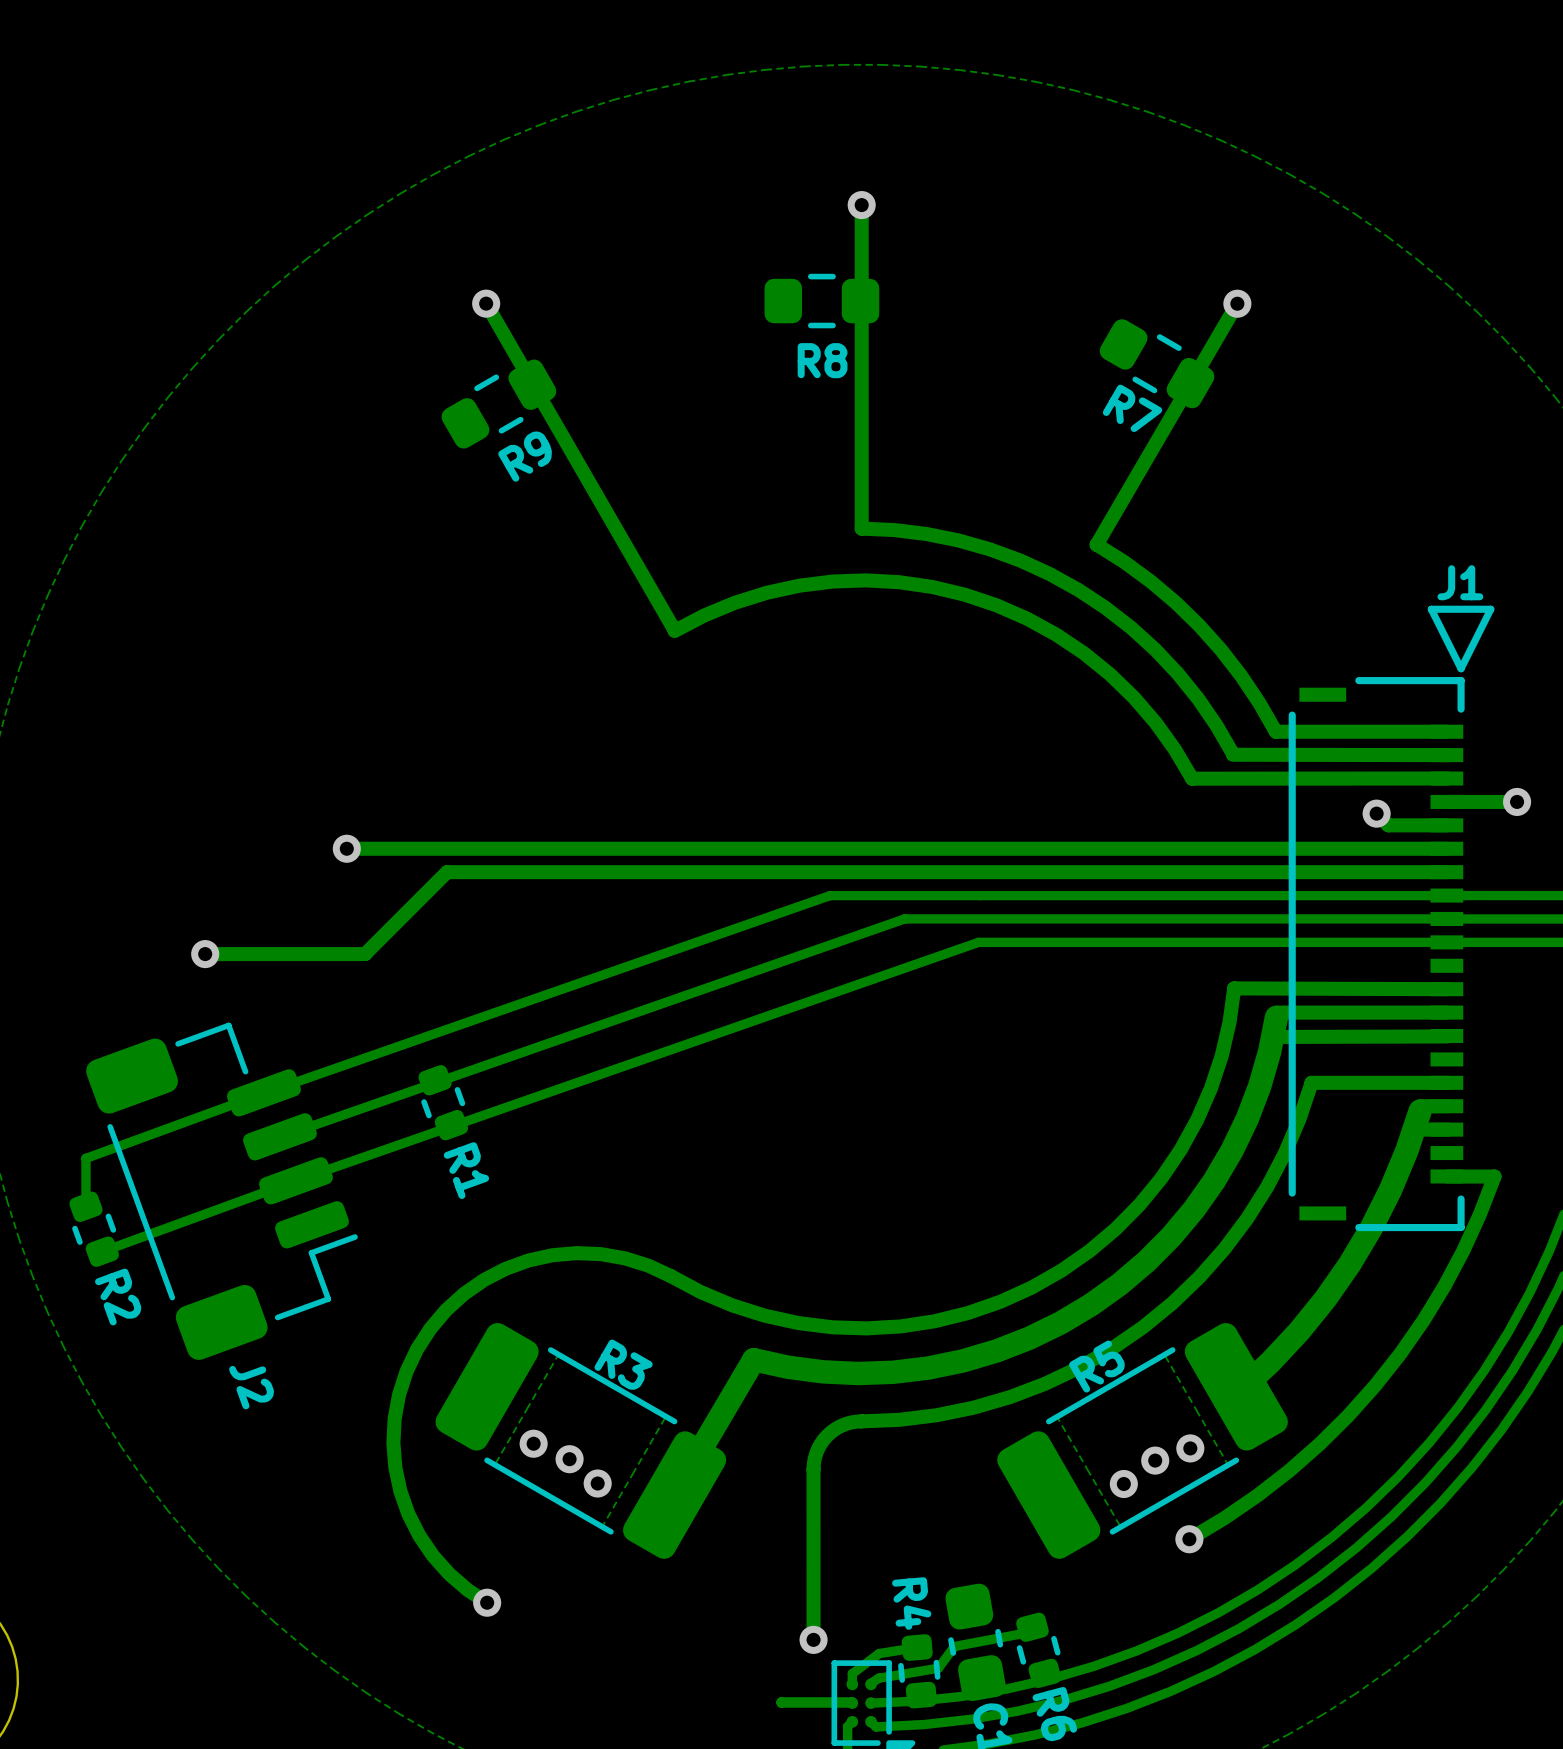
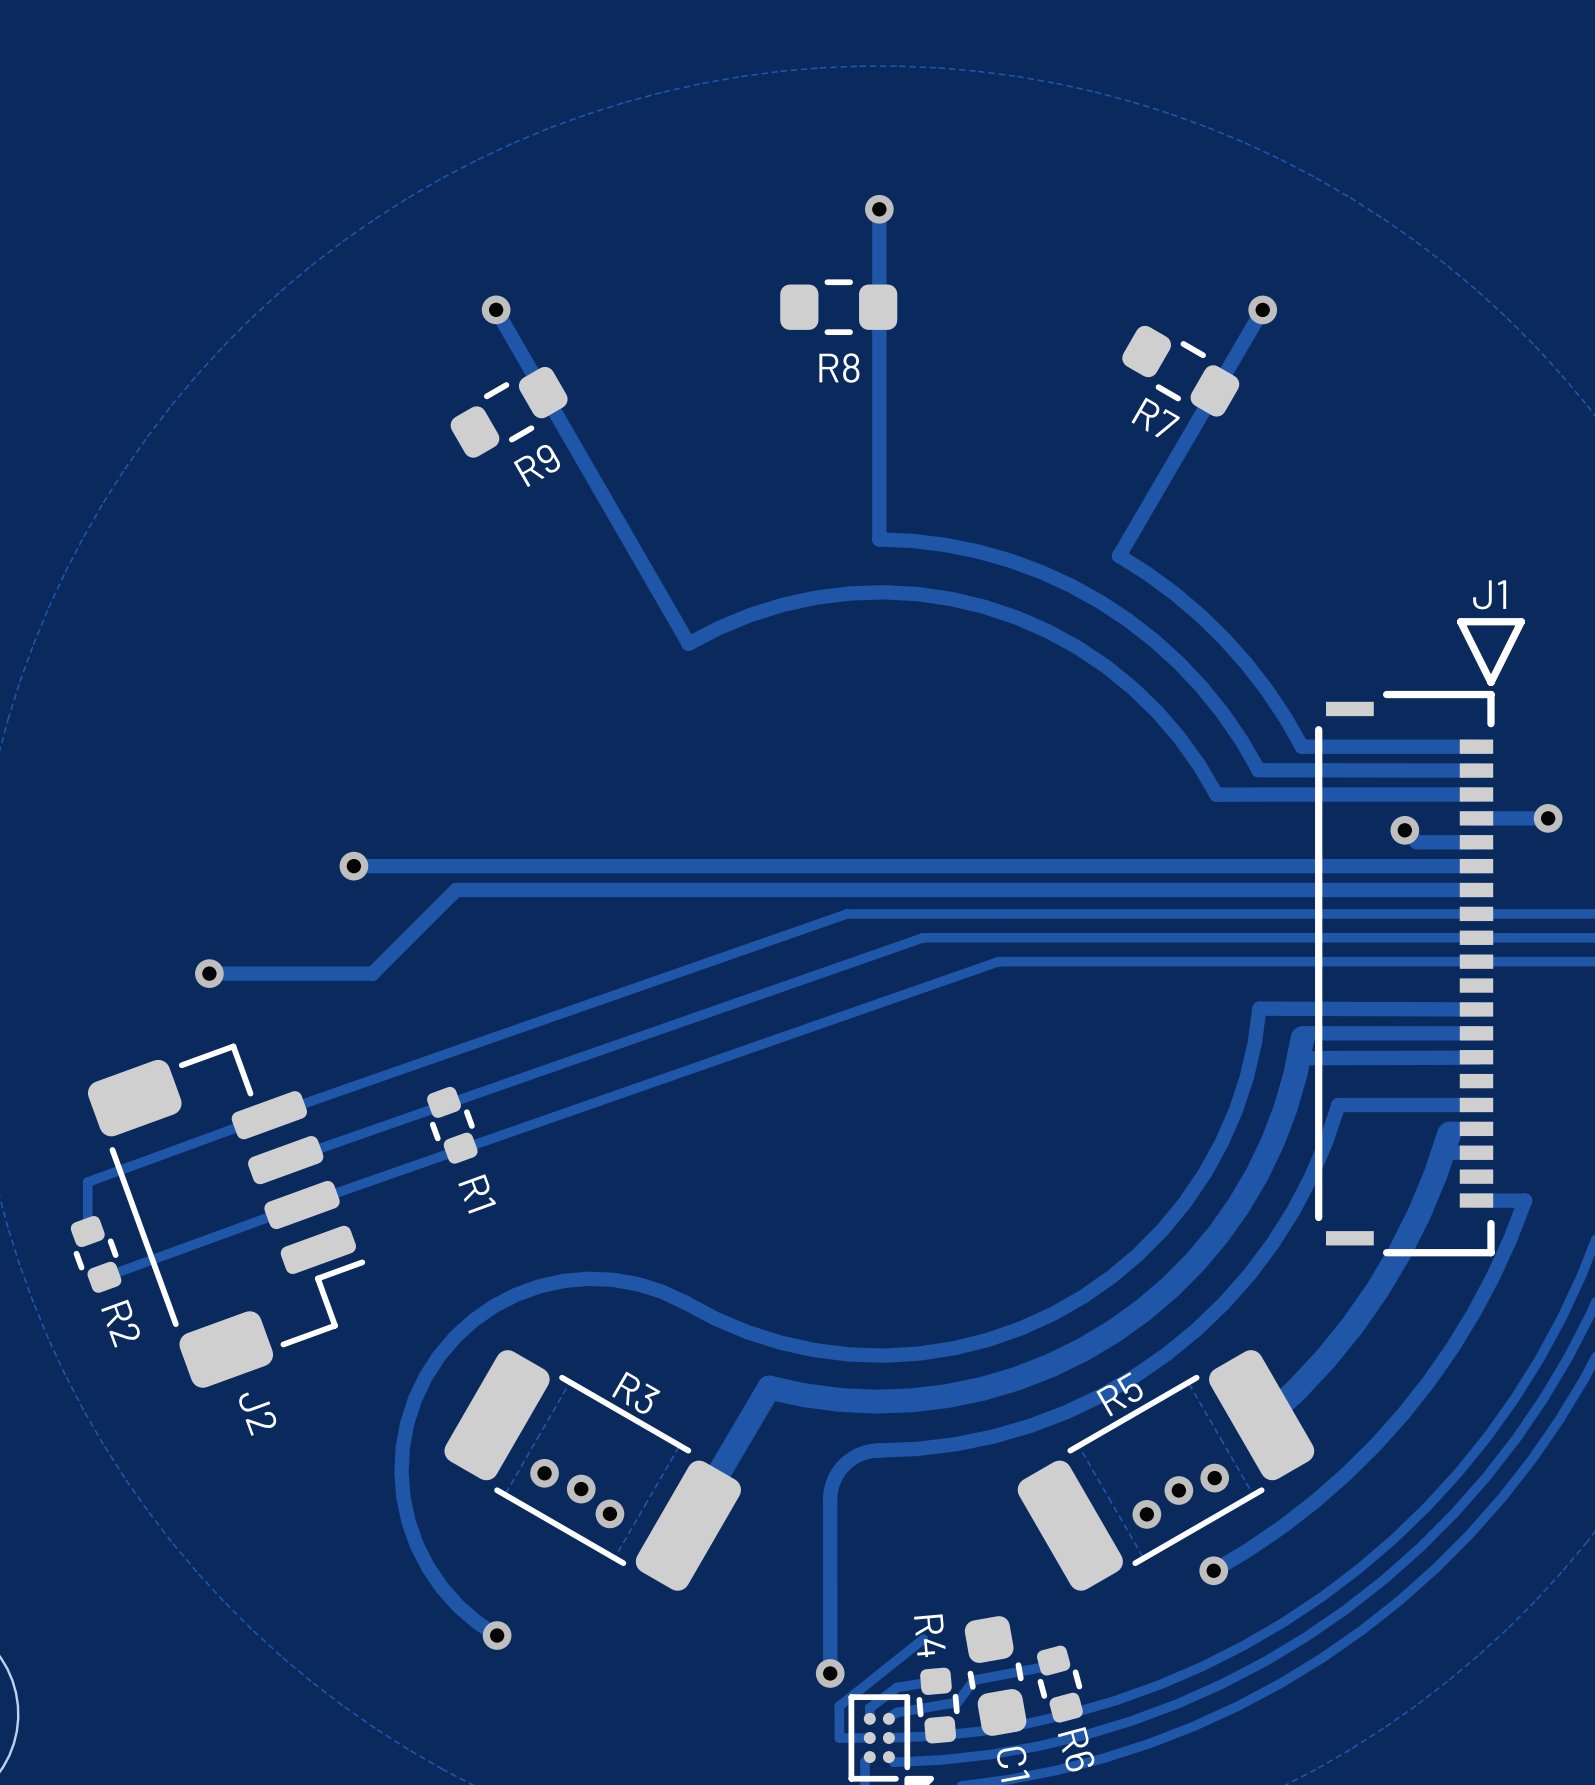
track: (852, 1701) (781, 1701) (781, 1703) (852, 1703) (852, 1701) -> (923, 1639) (839, 1706) (839, 1738) (869, 1737)

